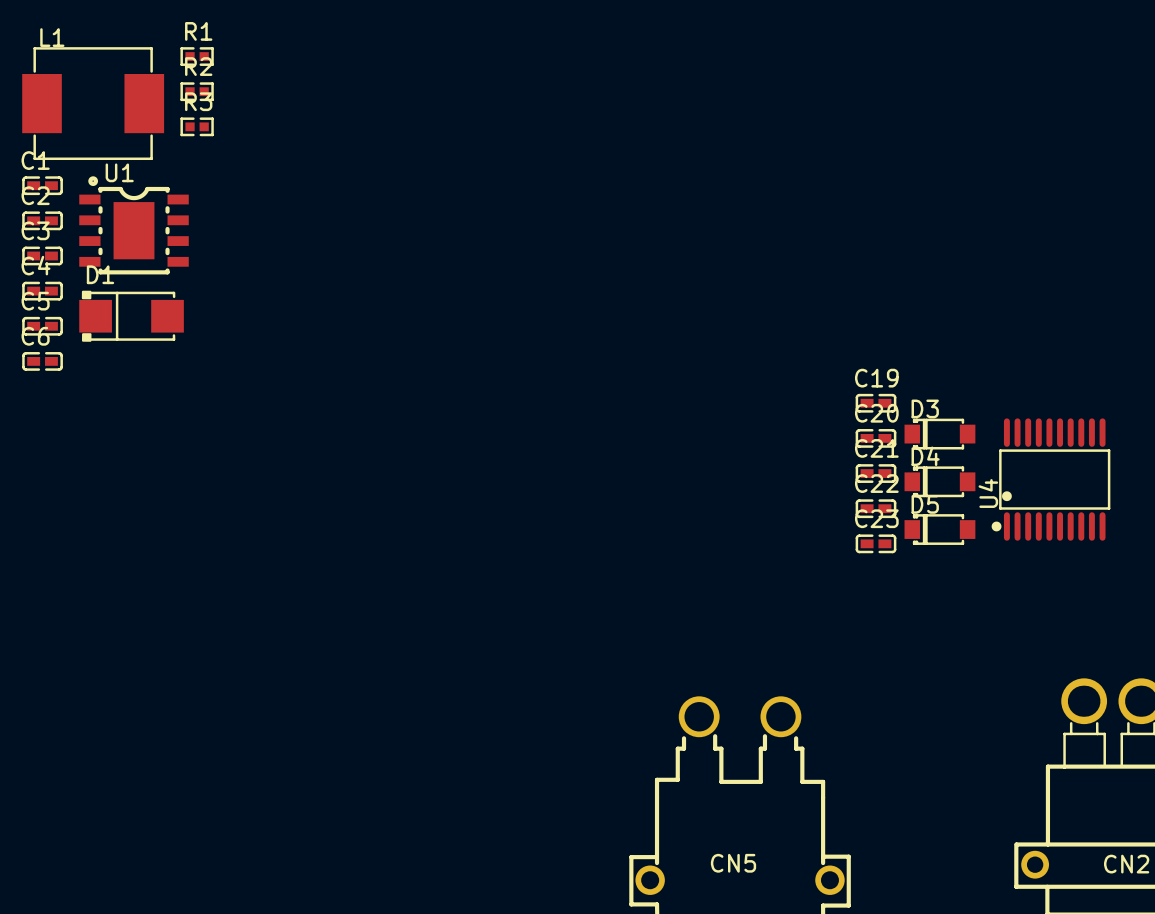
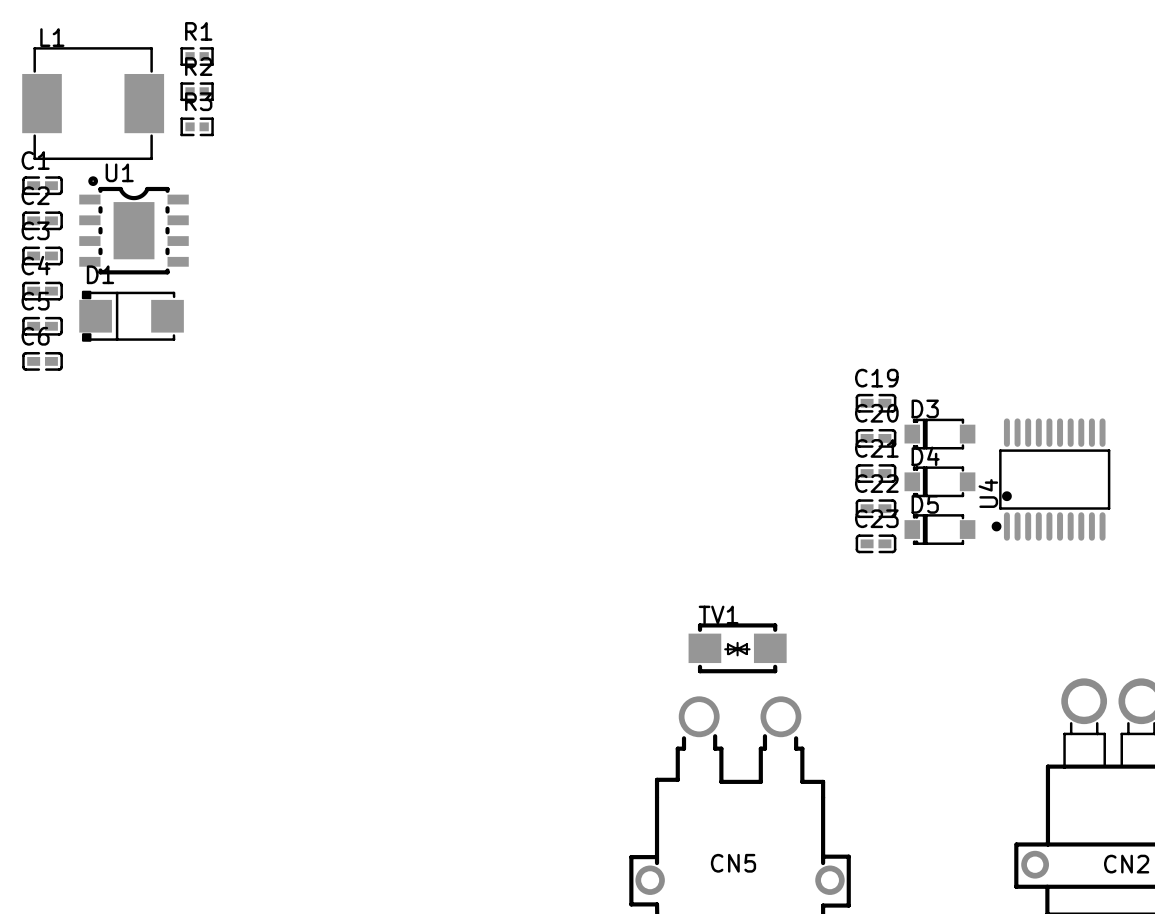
TV1: none -> (737, 648)

